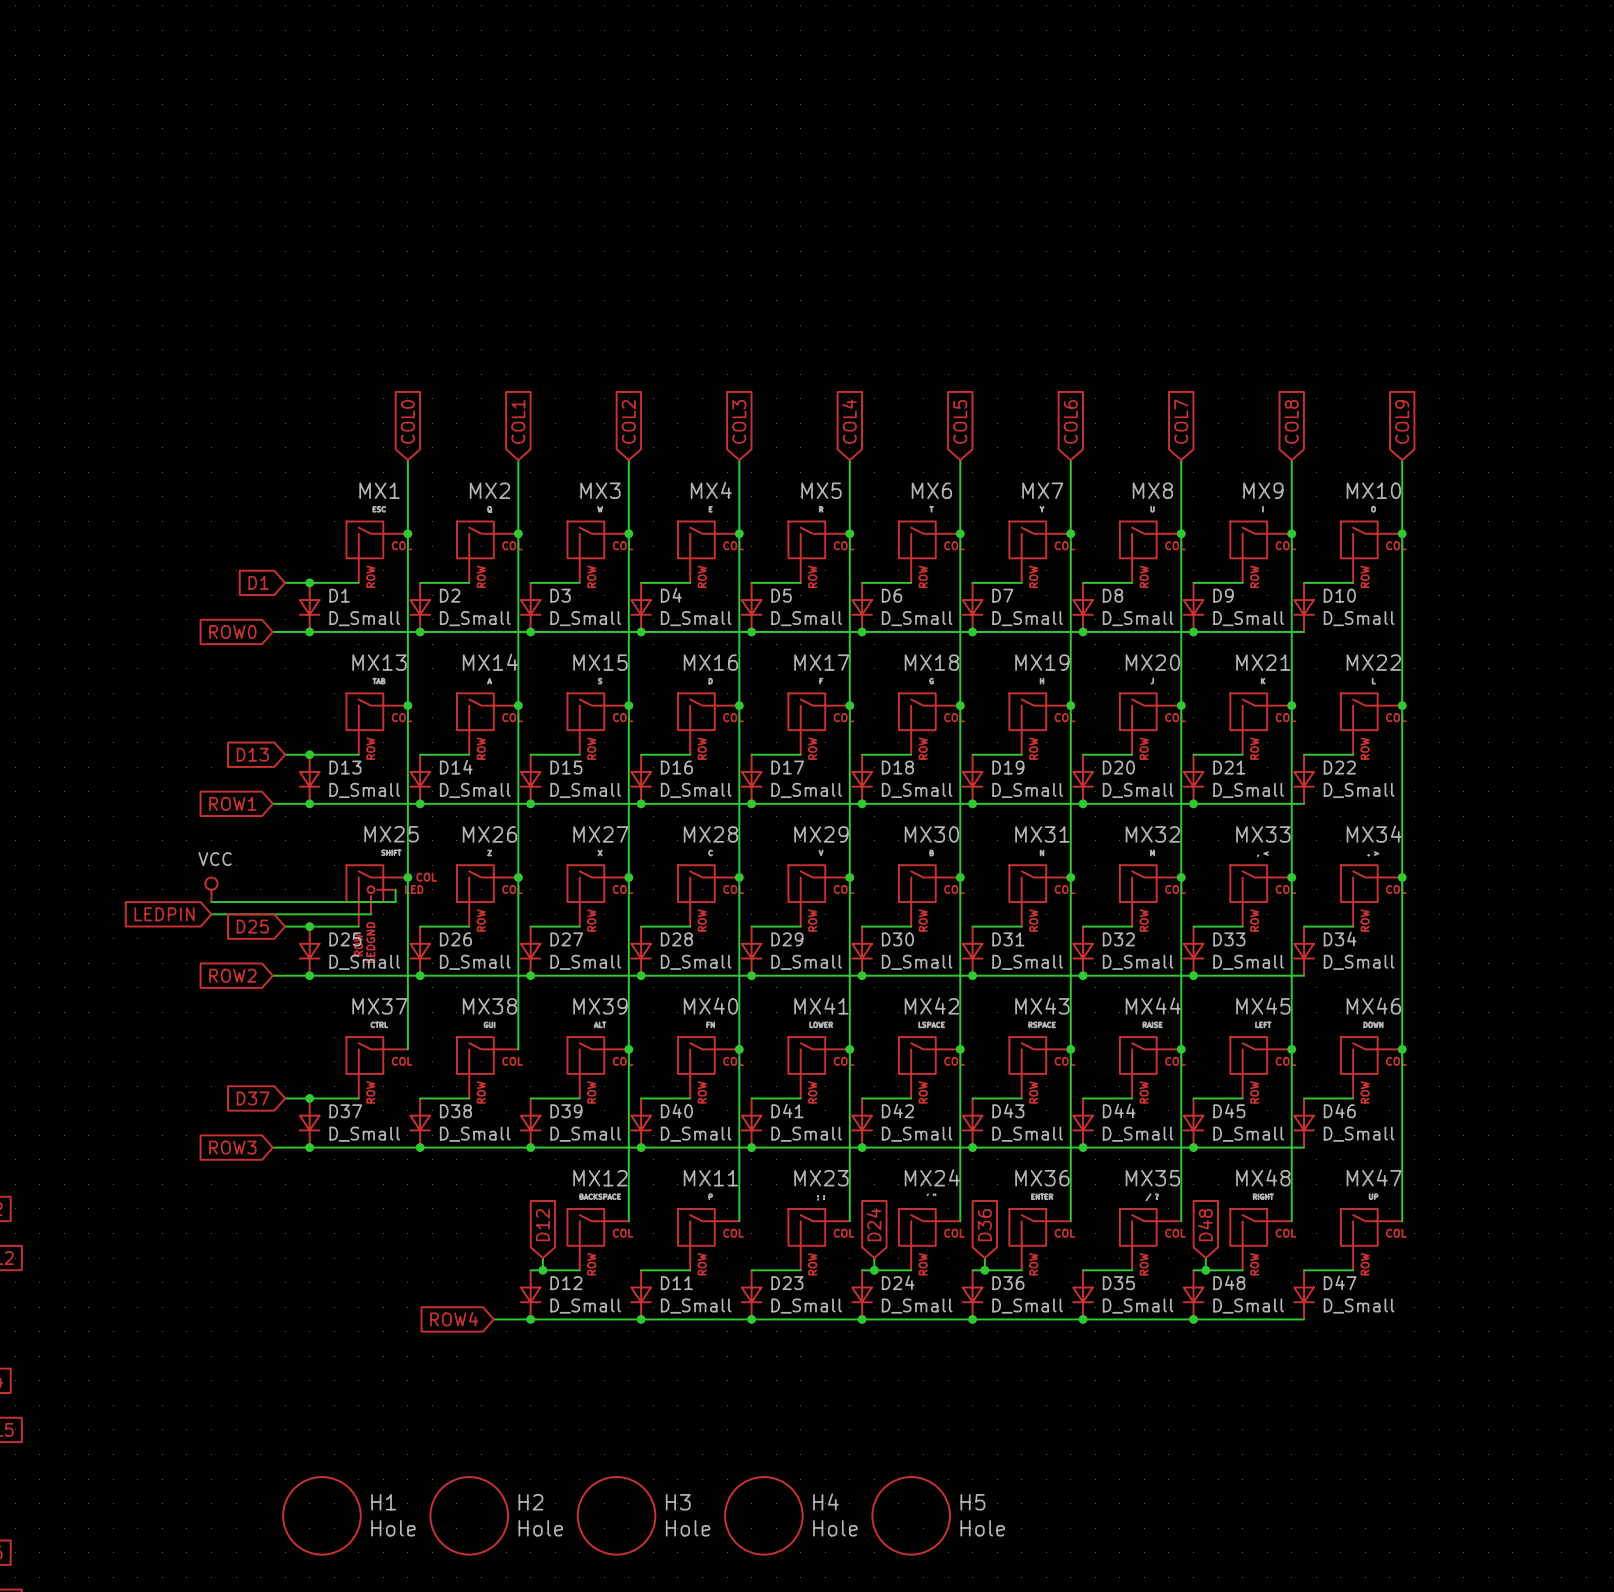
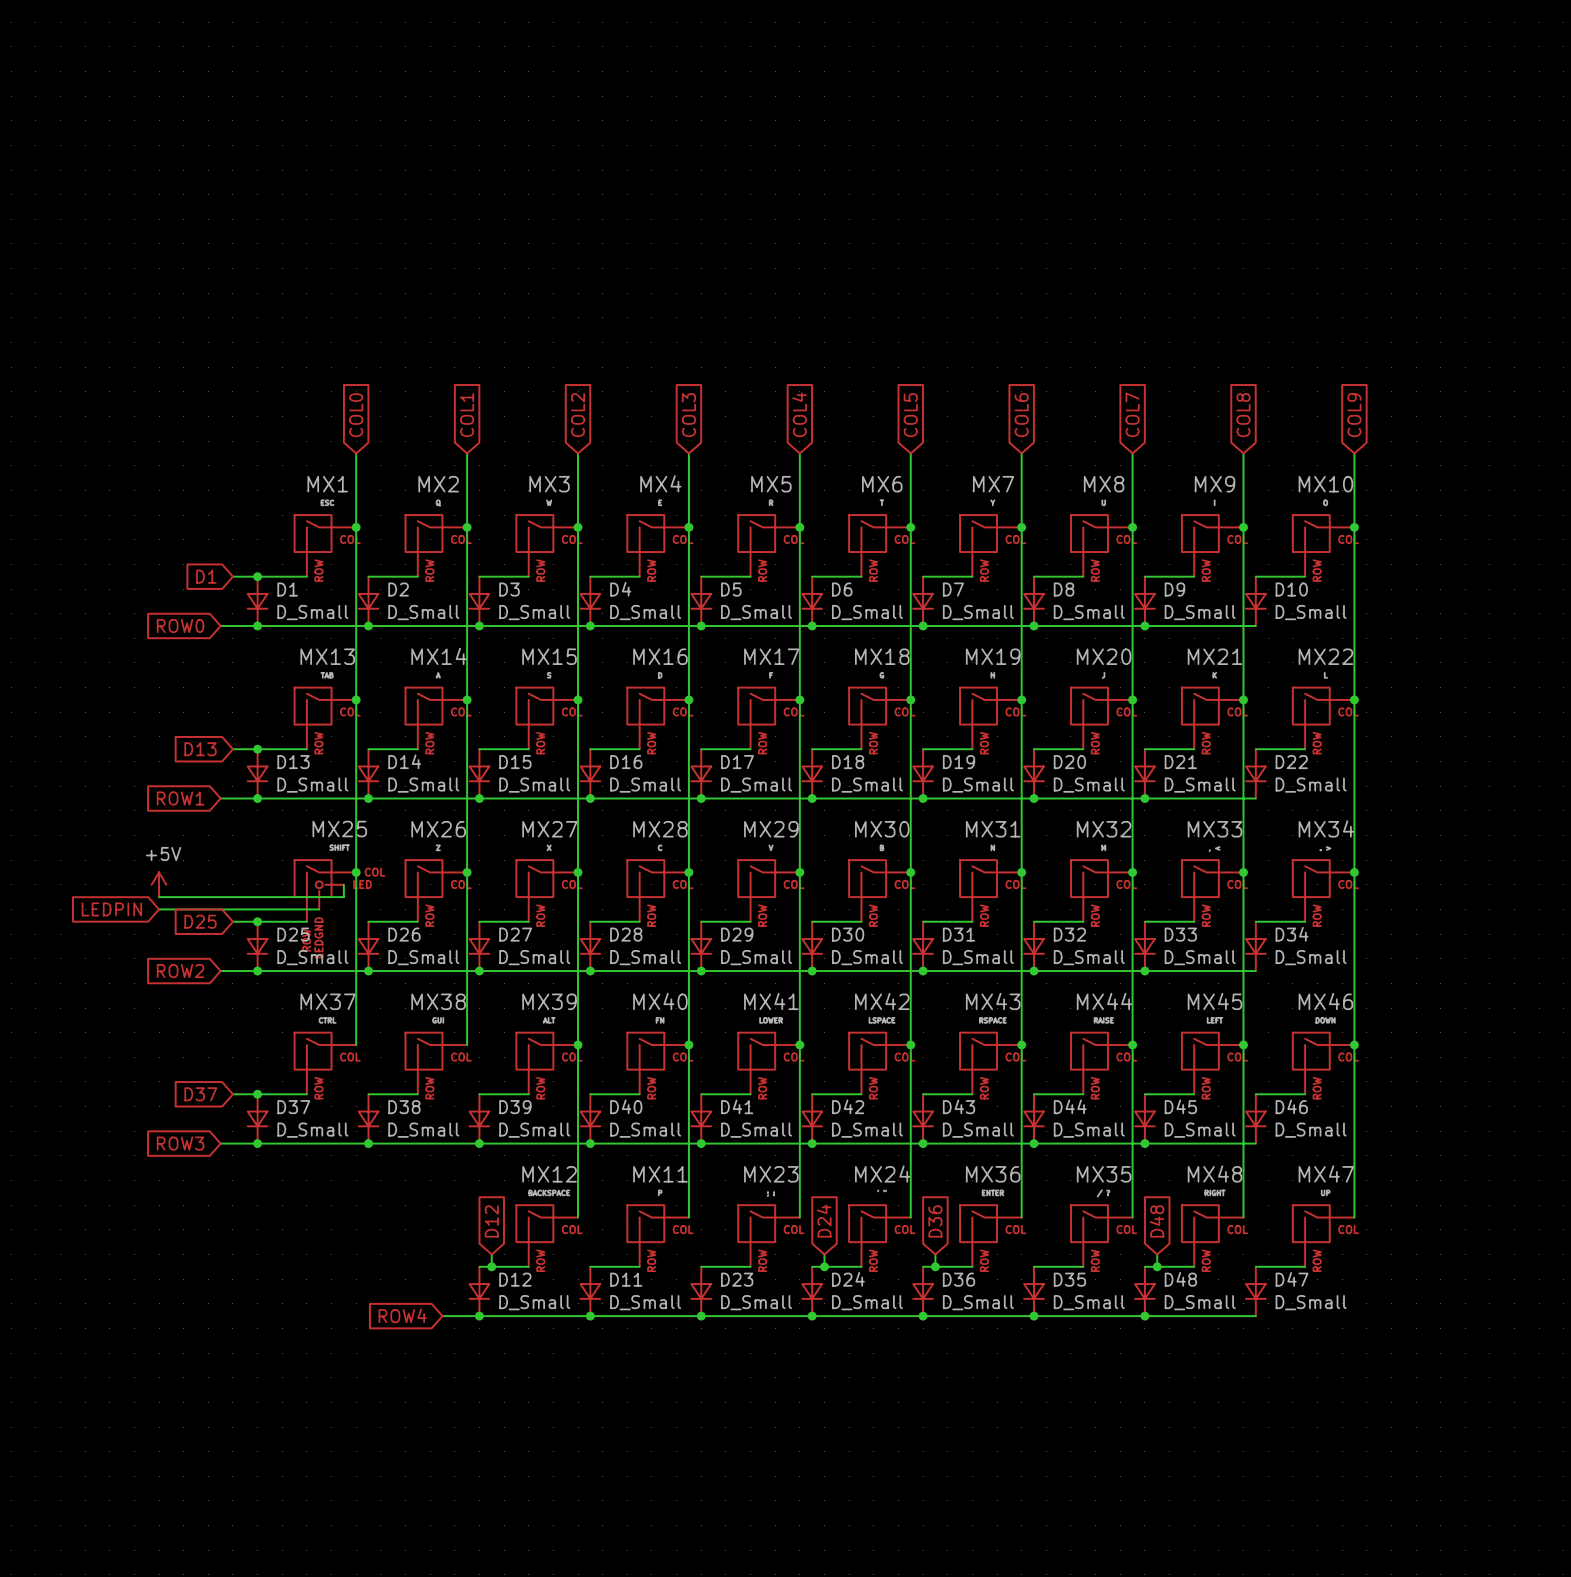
power symbol: VCC (211, 889) -> +5V (159, 884)
H1: Hole (321, 1515) -> none
H2: Hole (469, 1515) -> none
H3: Hole (616, 1515) -> none
H4: Hole (763, 1515) -> none
H5: Hole (911, 1515) -> none

